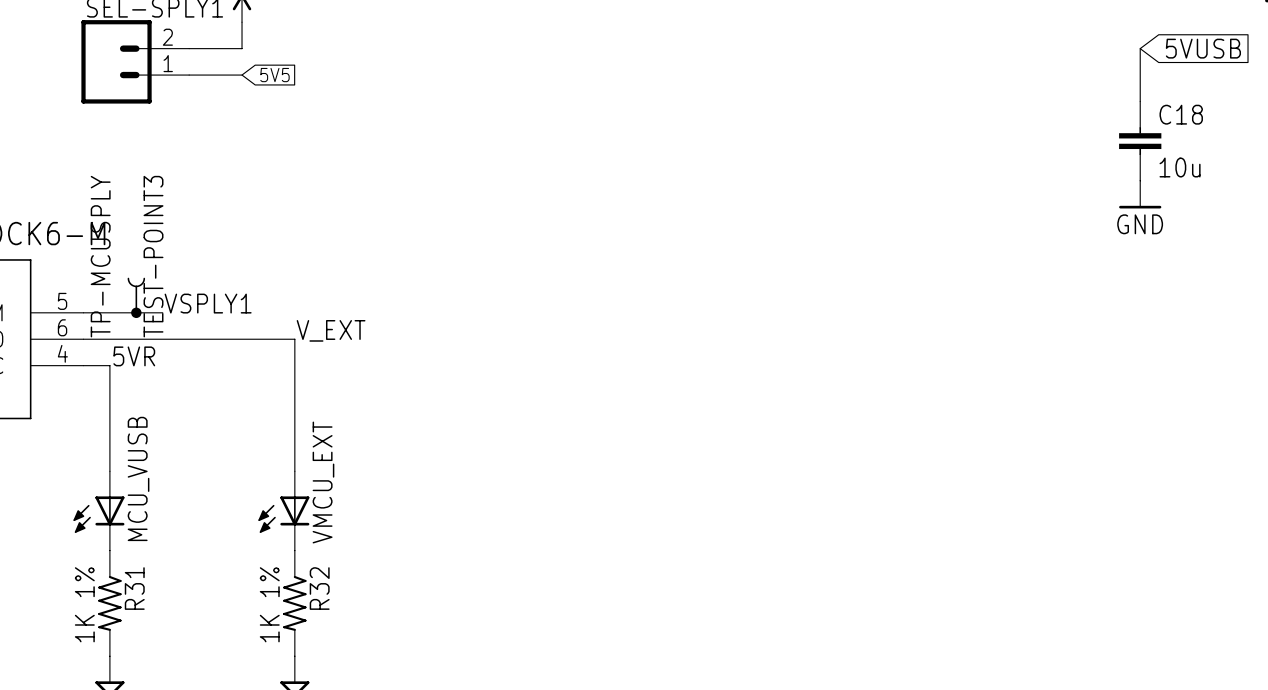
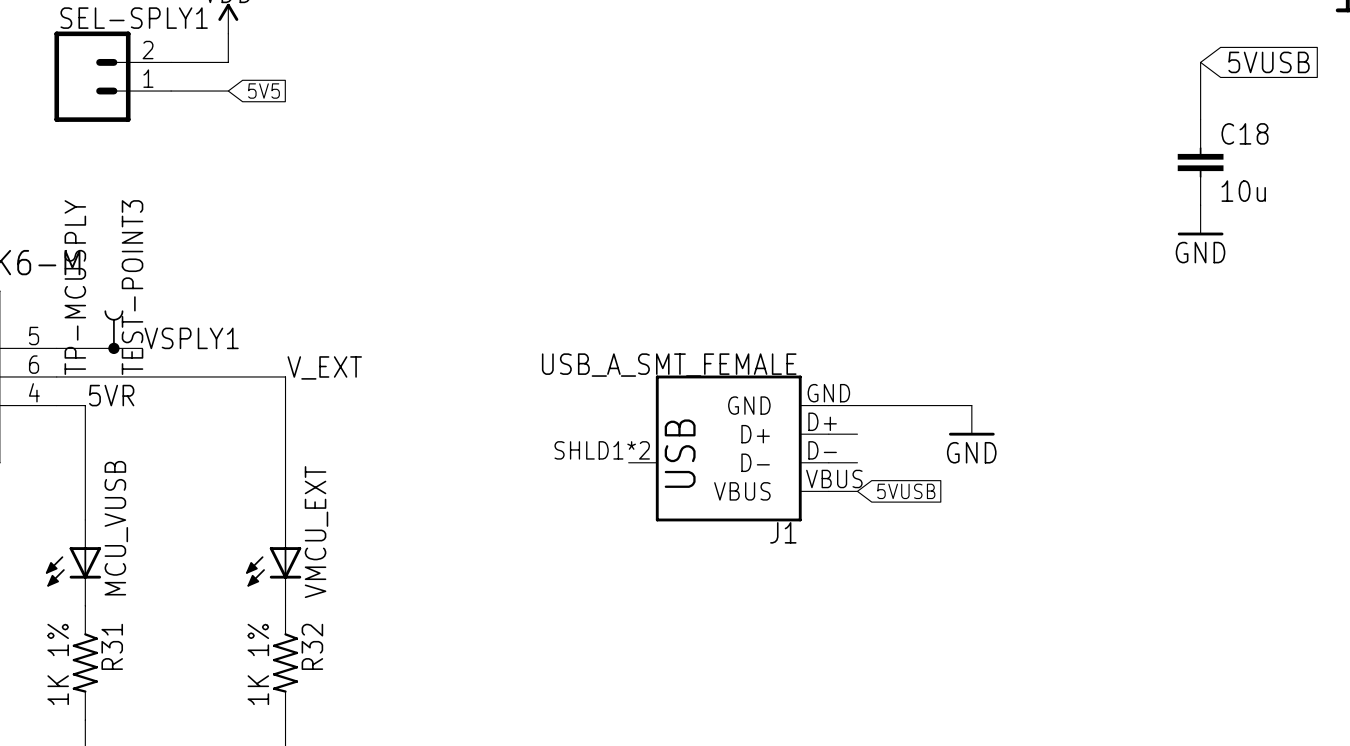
wire: none -> (828, 405) (971, 405)
power symbol: none -> GND (971, 420)
wire: none -> (828, 434) (857, 434)
J1: none -> USB_A_SMT_FEMALE (728, 448)
wire: none -> (828, 462) (857, 462)
wire: none -> (828, 491) (857, 491)
global label: none -> 5VUSB (906, 491)

